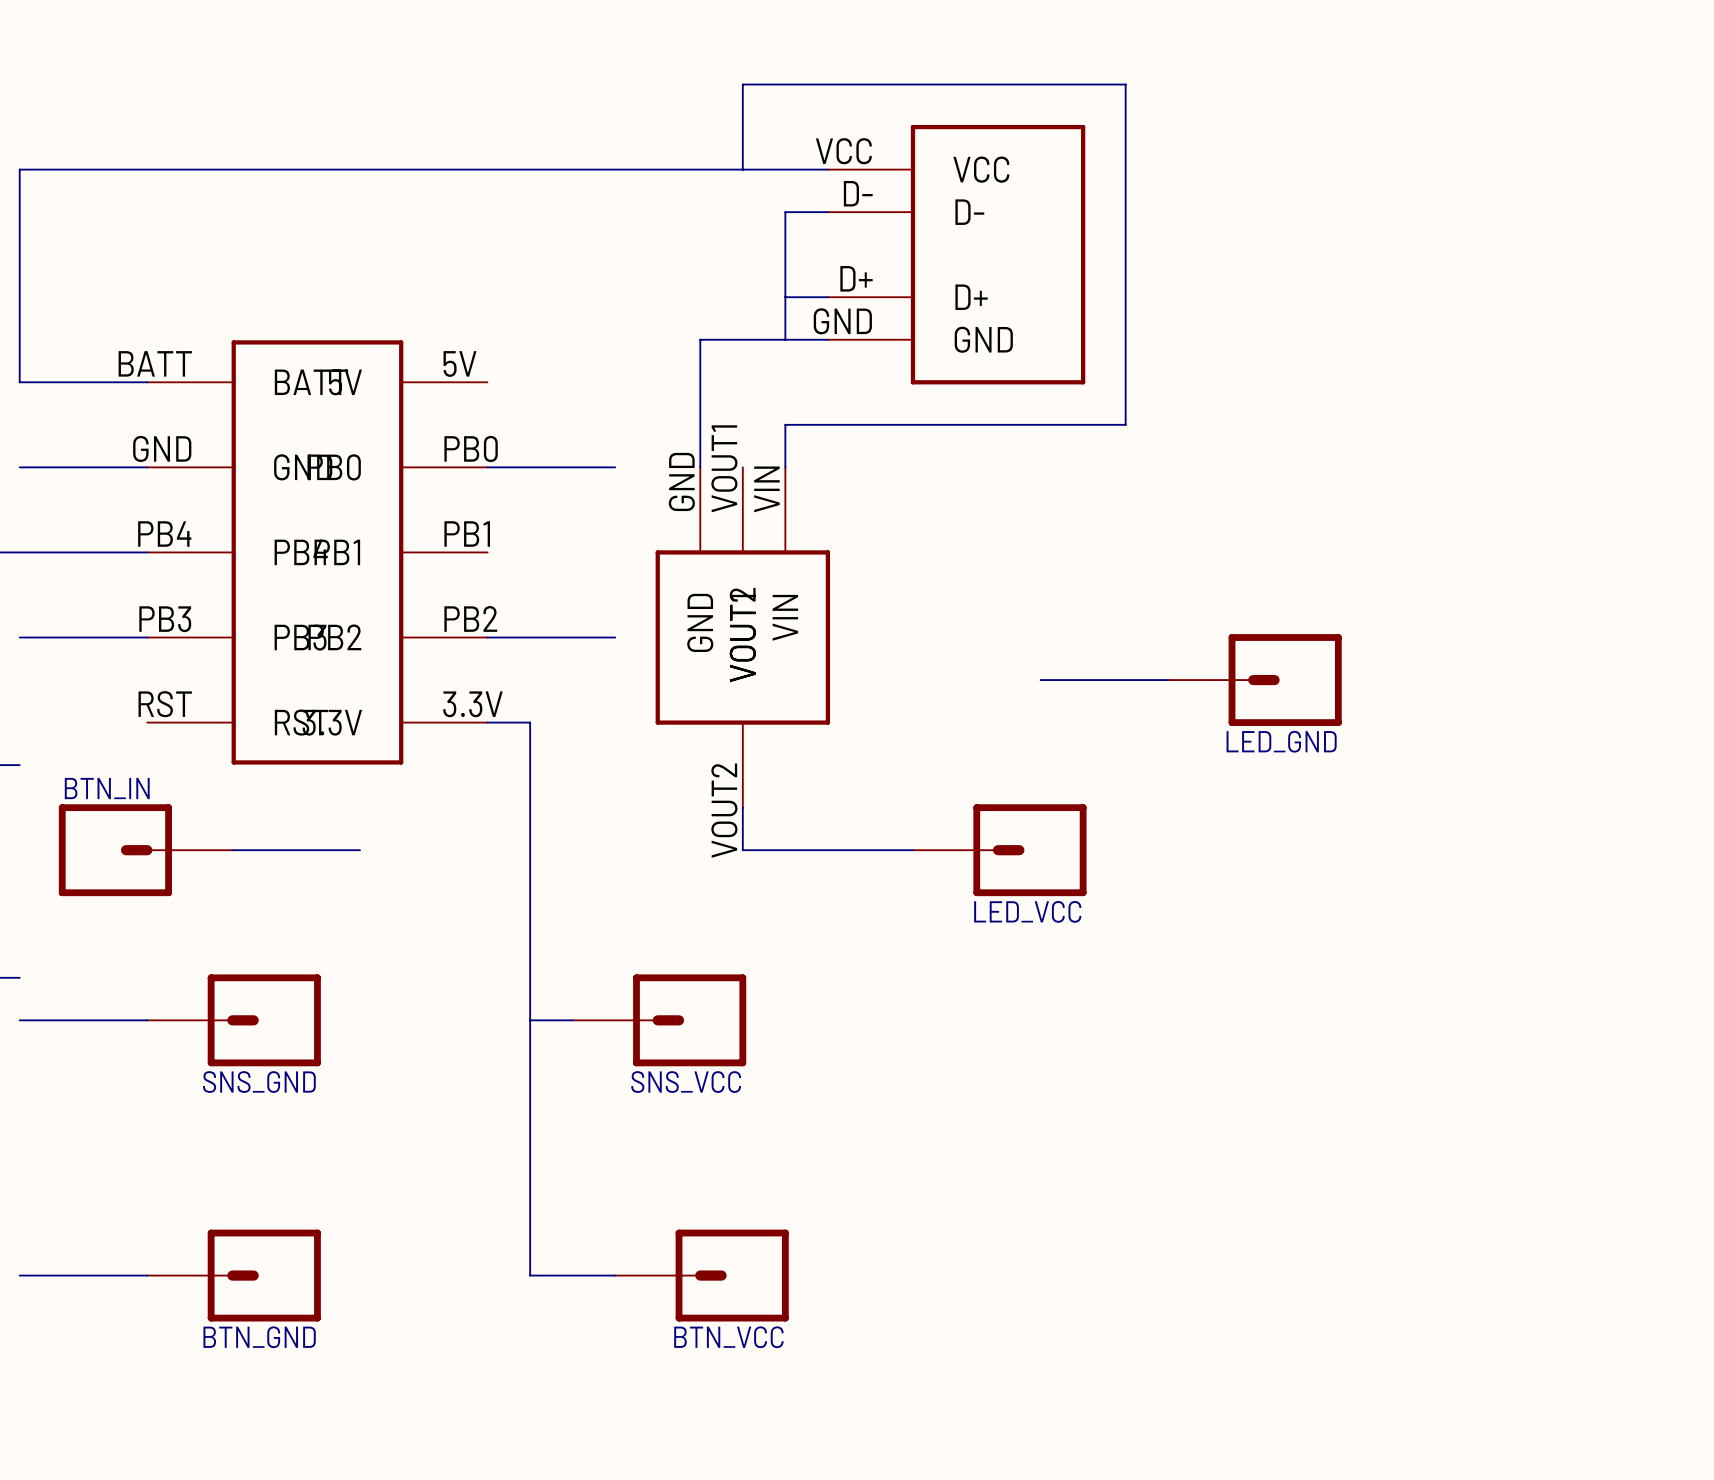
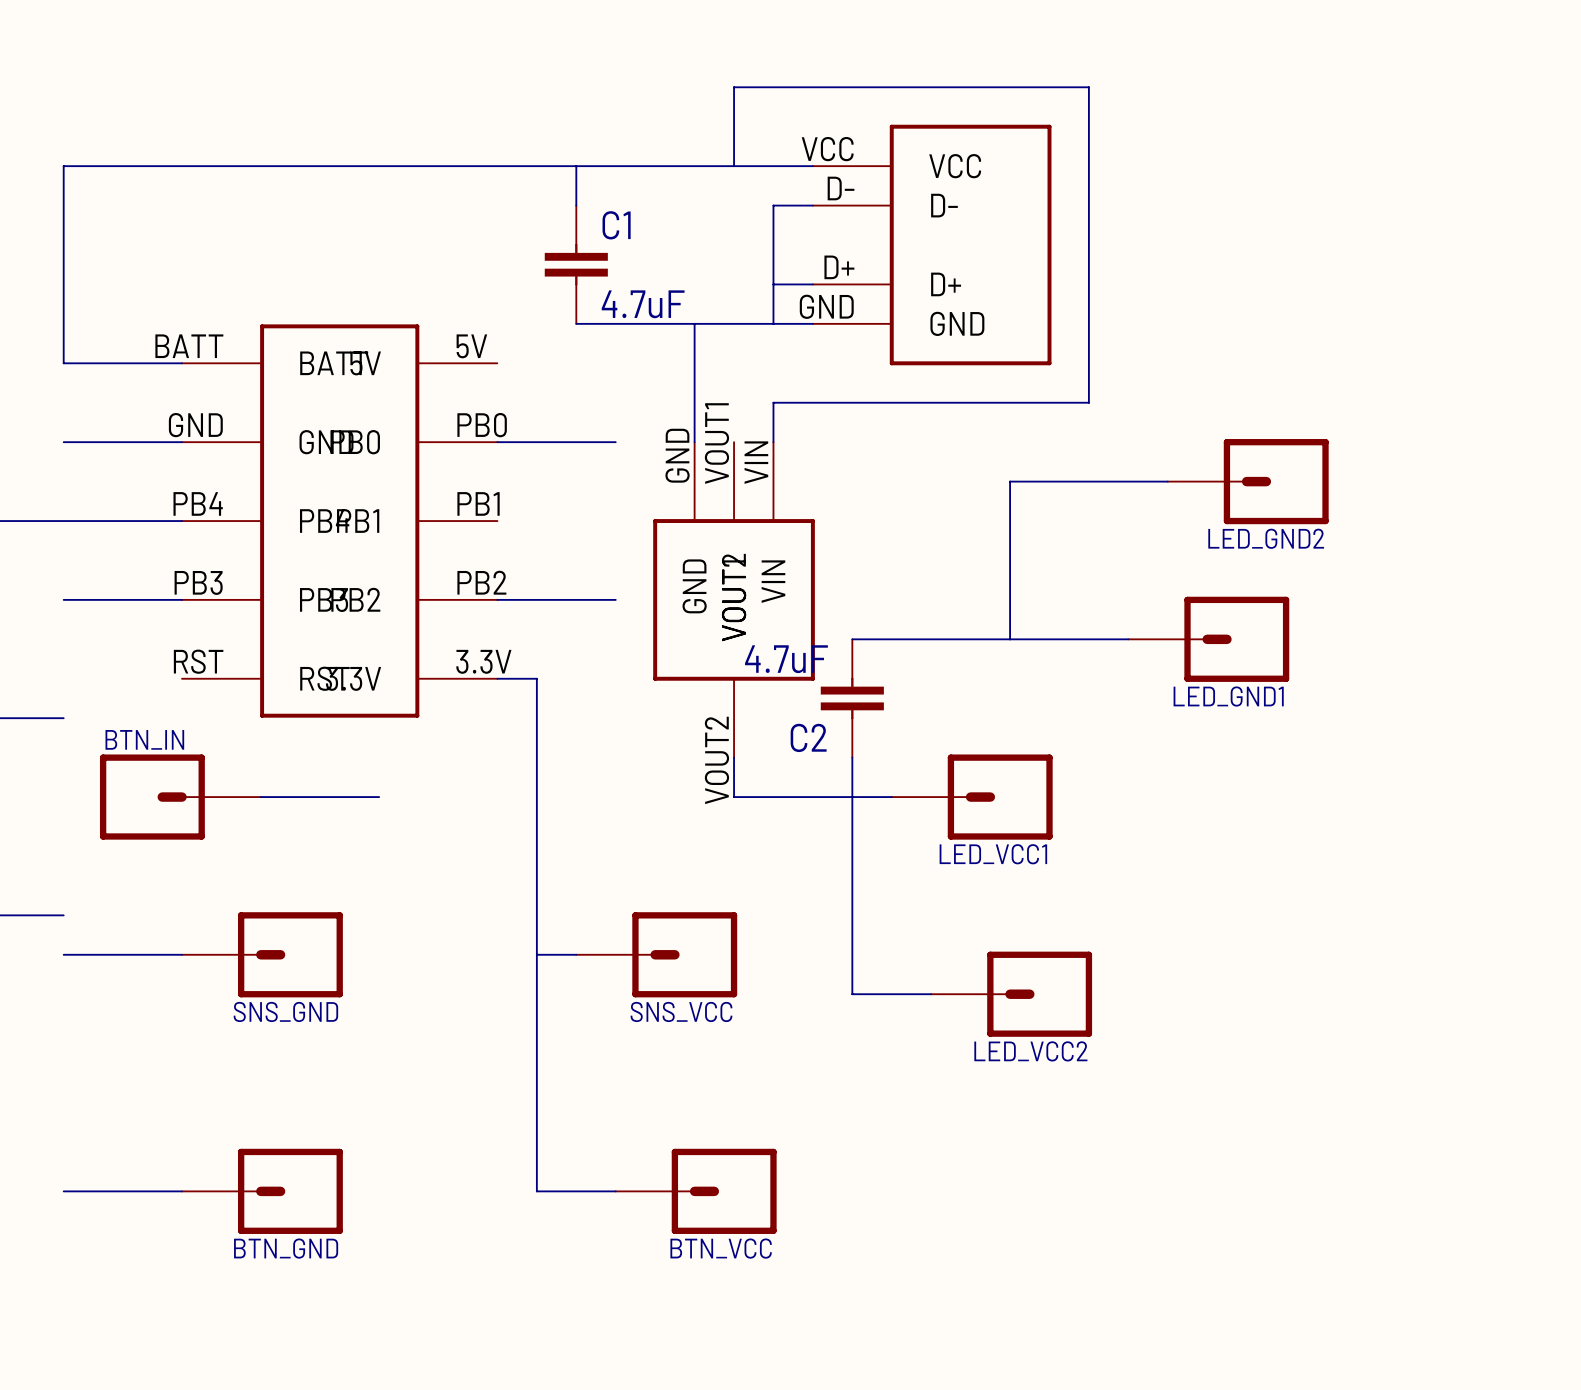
wire: none -> (576, 166) (576, 205)
C1: none -> 4.7uF (576, 264)
wire: none -> (576, 323) (694, 323)
wire: none -> (1167, 481) (1010, 481) (1010, 639) (852, 639)
LED_GND2: none -> (1248, 481)
LED_GND name: LED_GND (1281, 741) -> LED_GND1 (1228, 696)
C2: none -> 4.7uF (852, 698)
wire: none -> (852, 757) (852, 994) (931, 994)
LED_VCC name: LED_VCC (1027, 911) -> LED_VCC1 (993, 854)
LED_VCC2: none -> (1011, 994)

